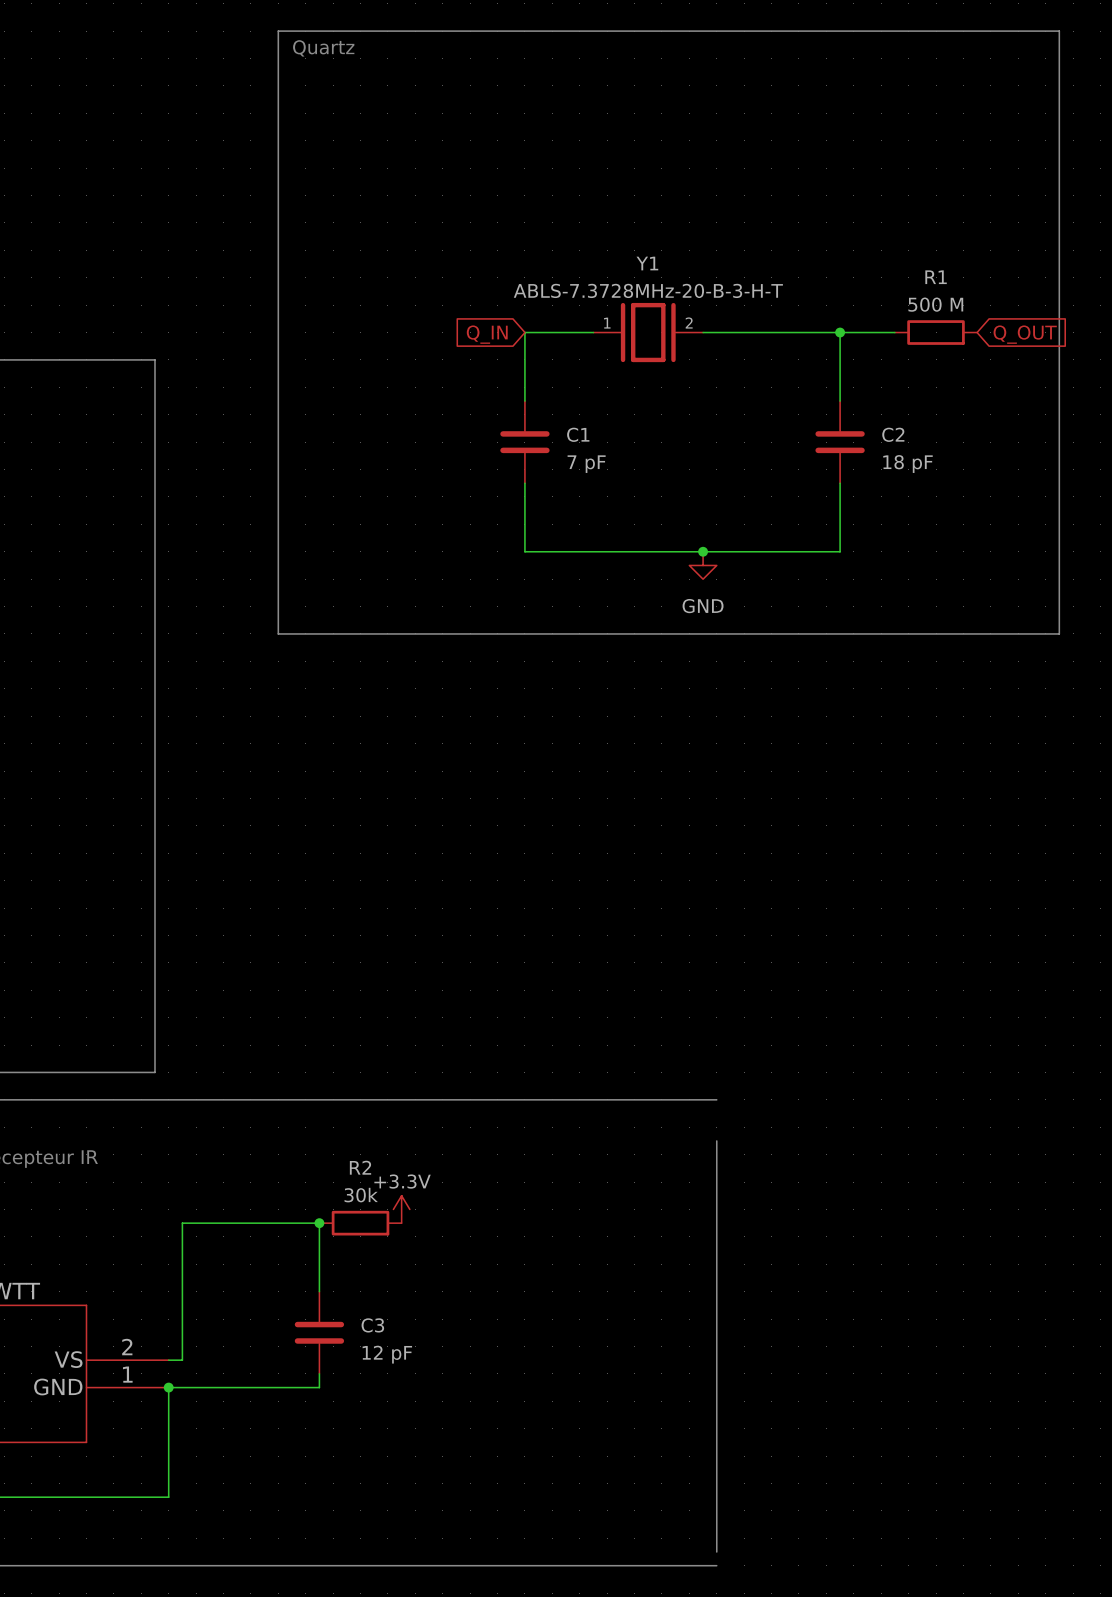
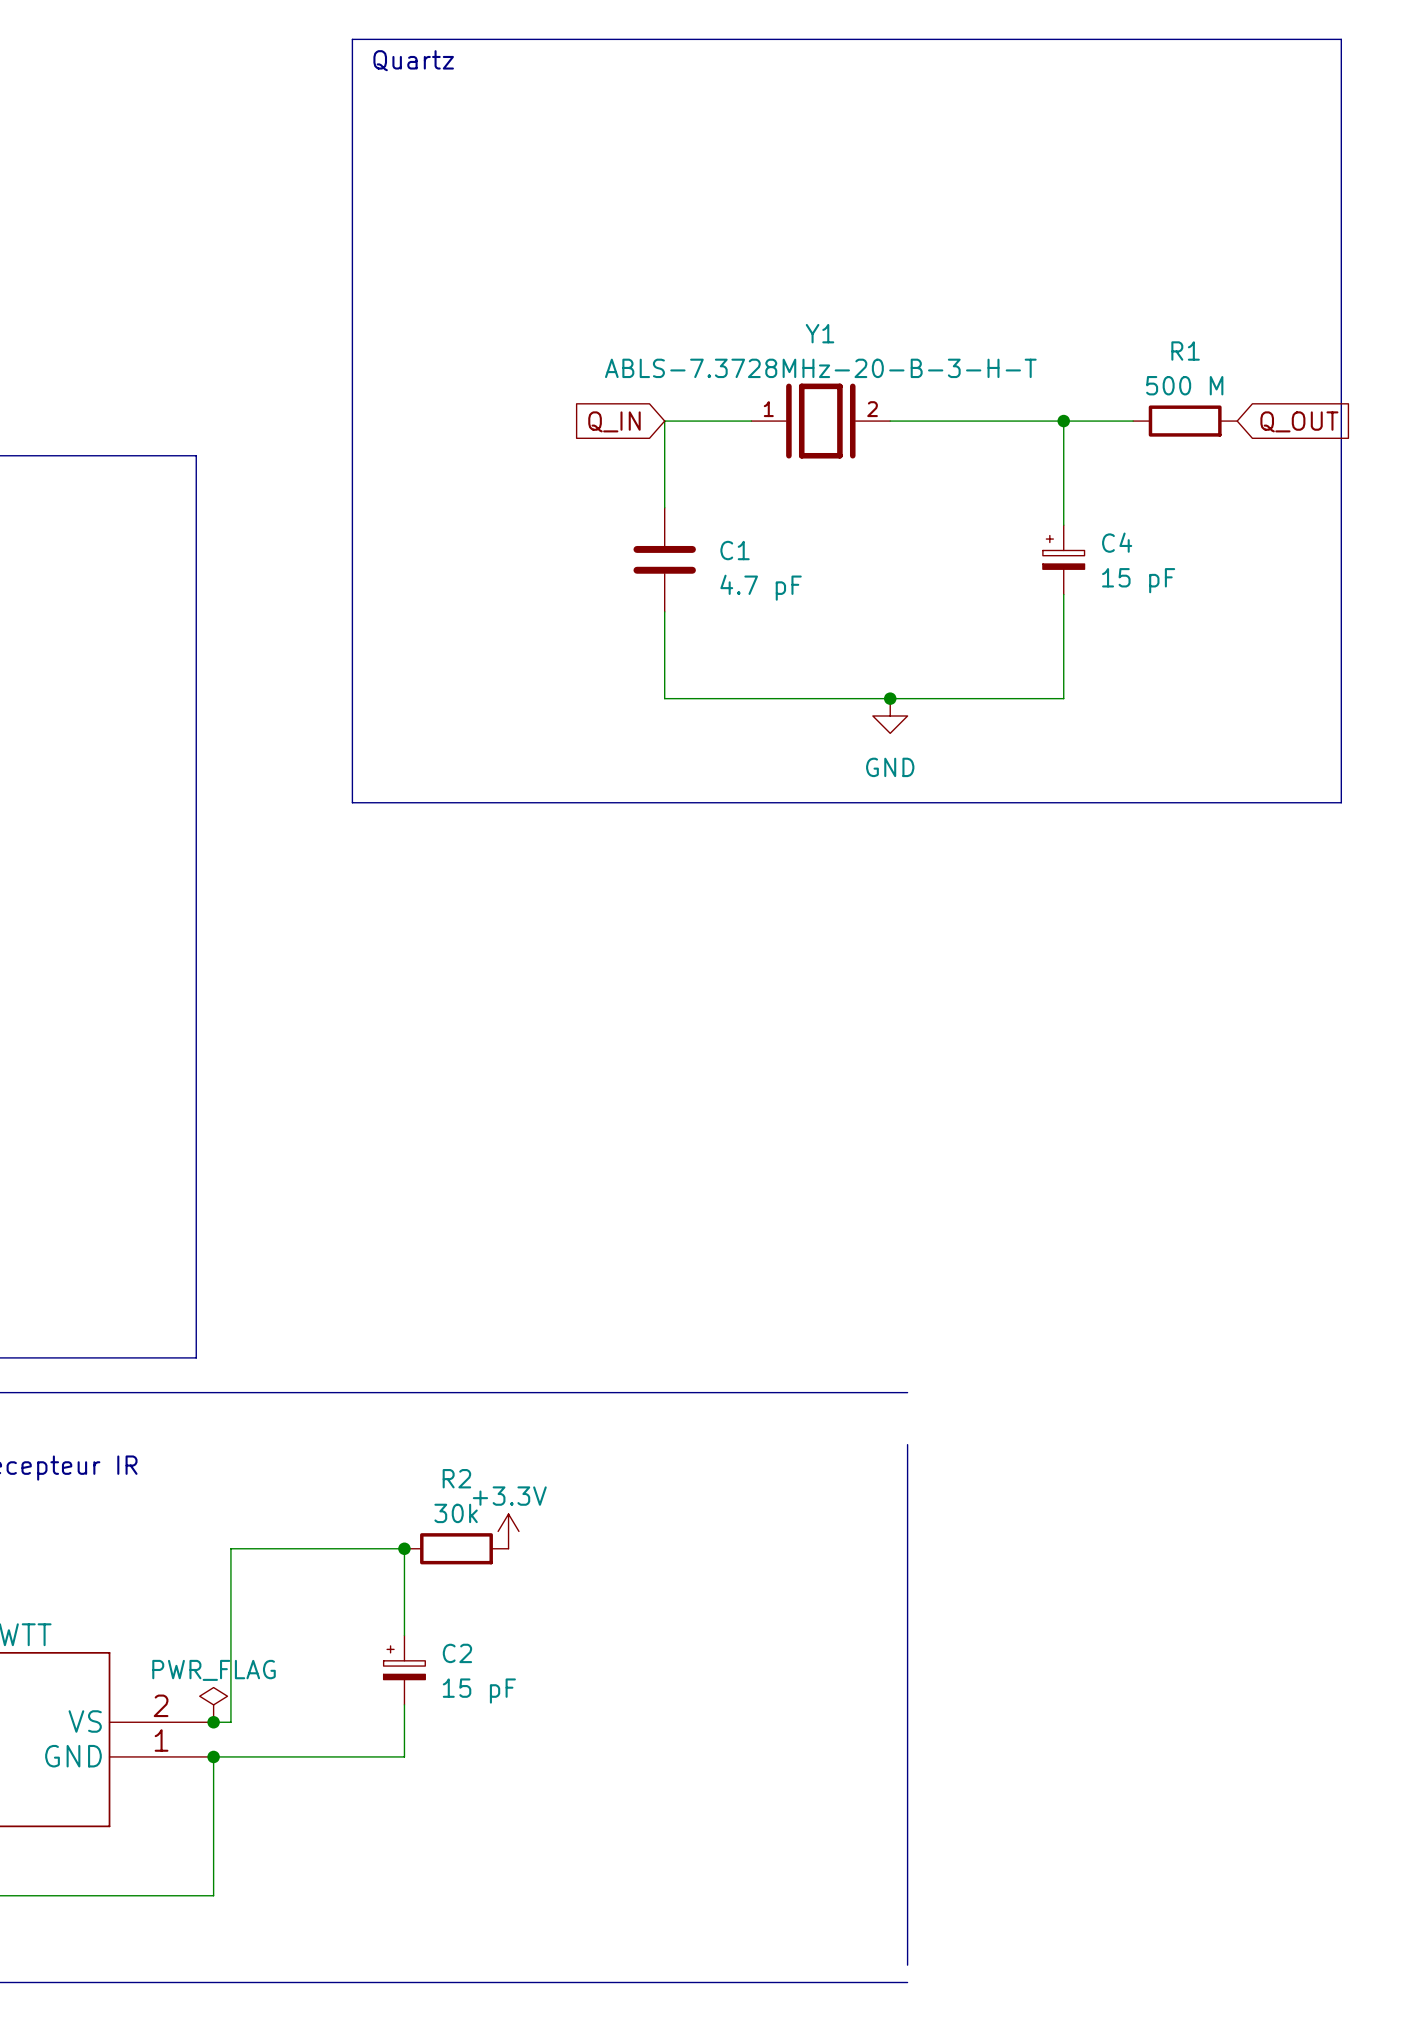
C2 symbol: [815, 401, 865, 484] -> [383, 1635, 426, 1705]
C4: none -> 15 pF (1063, 559)
C1 value: 7 pF (586, 464) -> 4.7 pF (761, 587)
C2 value: 18 pF (907, 464) -> 15 pF (479, 1691)
C3: 12 pF (319, 1332) -> none
power symbol: none -> PWR_FLAG (213, 1704)
junction: none -> (213, 1722)

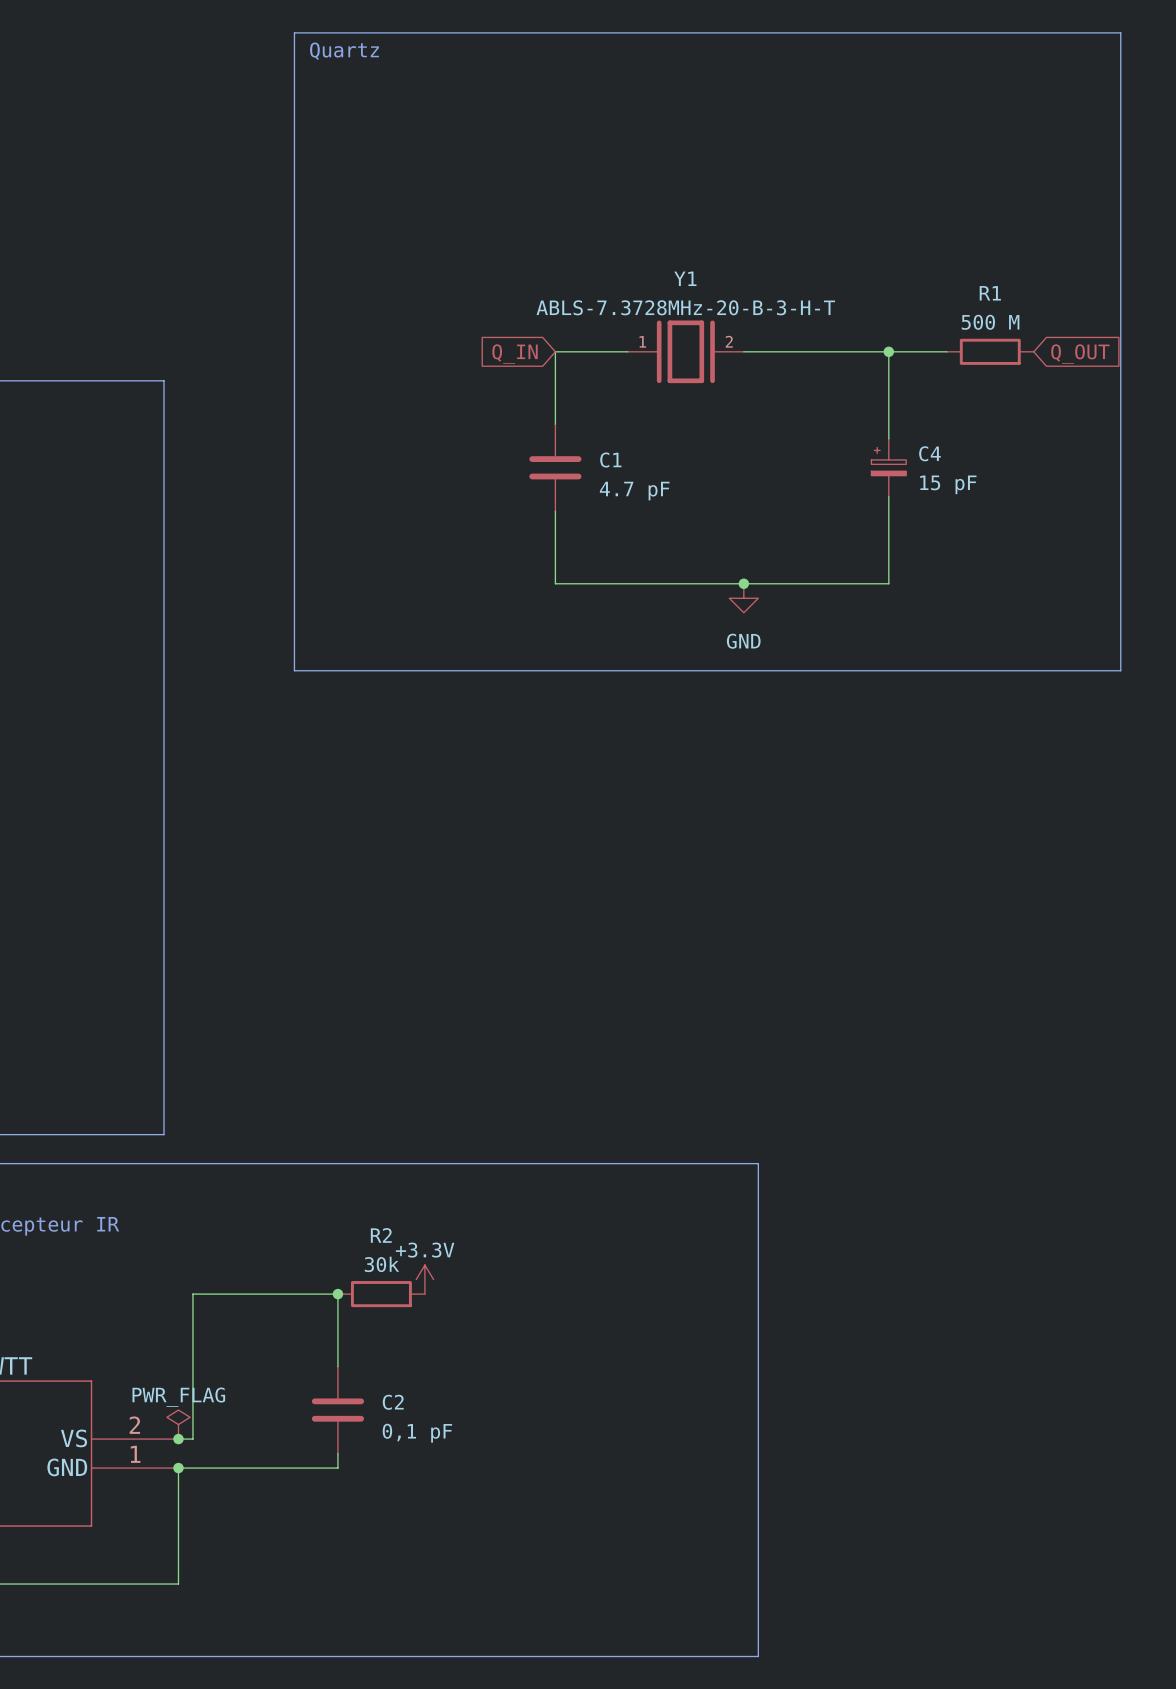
line: none -> (758, 1163) (758, 1207)
C2 symbol: [383, 1635, 426, 1705] -> [311, 1366, 365, 1454]
C2 value: 15 pF (479, 1691) -> 0,1 pF (417, 1433)
line: none -> (758, 1642) (758, 1656)

